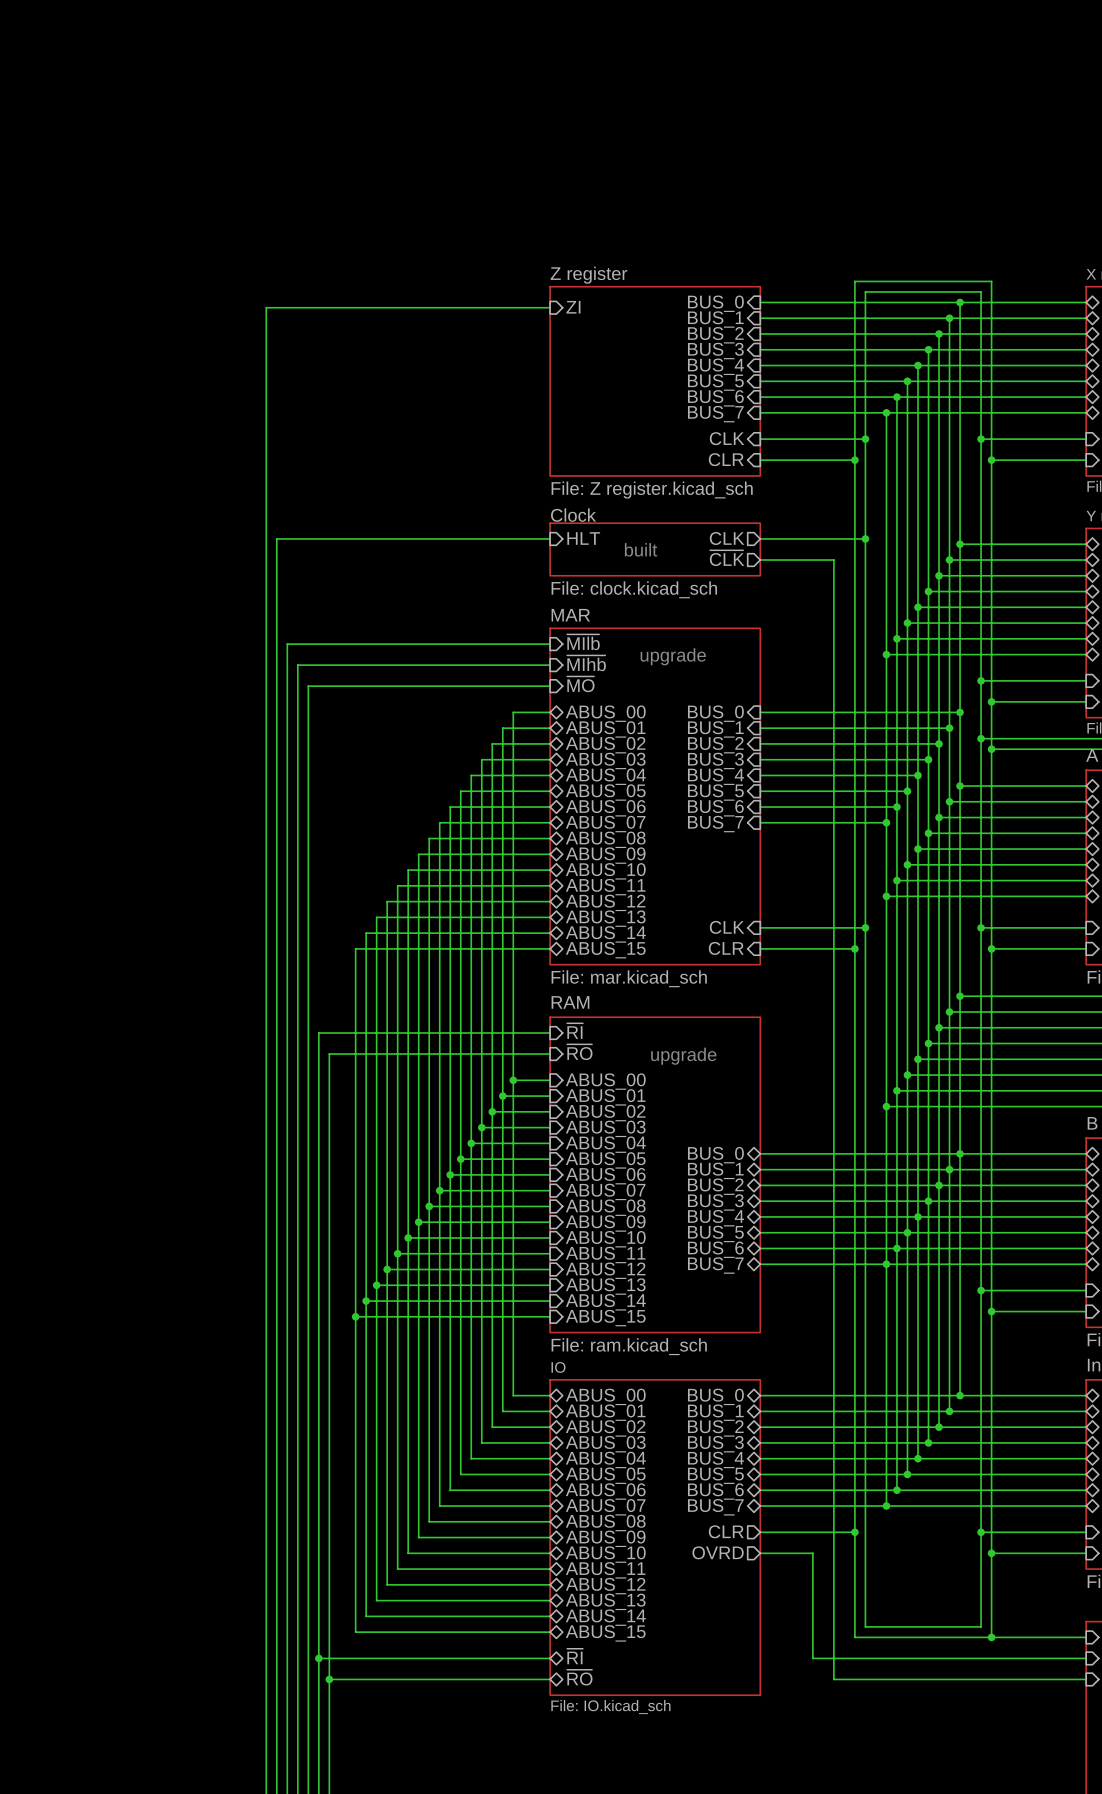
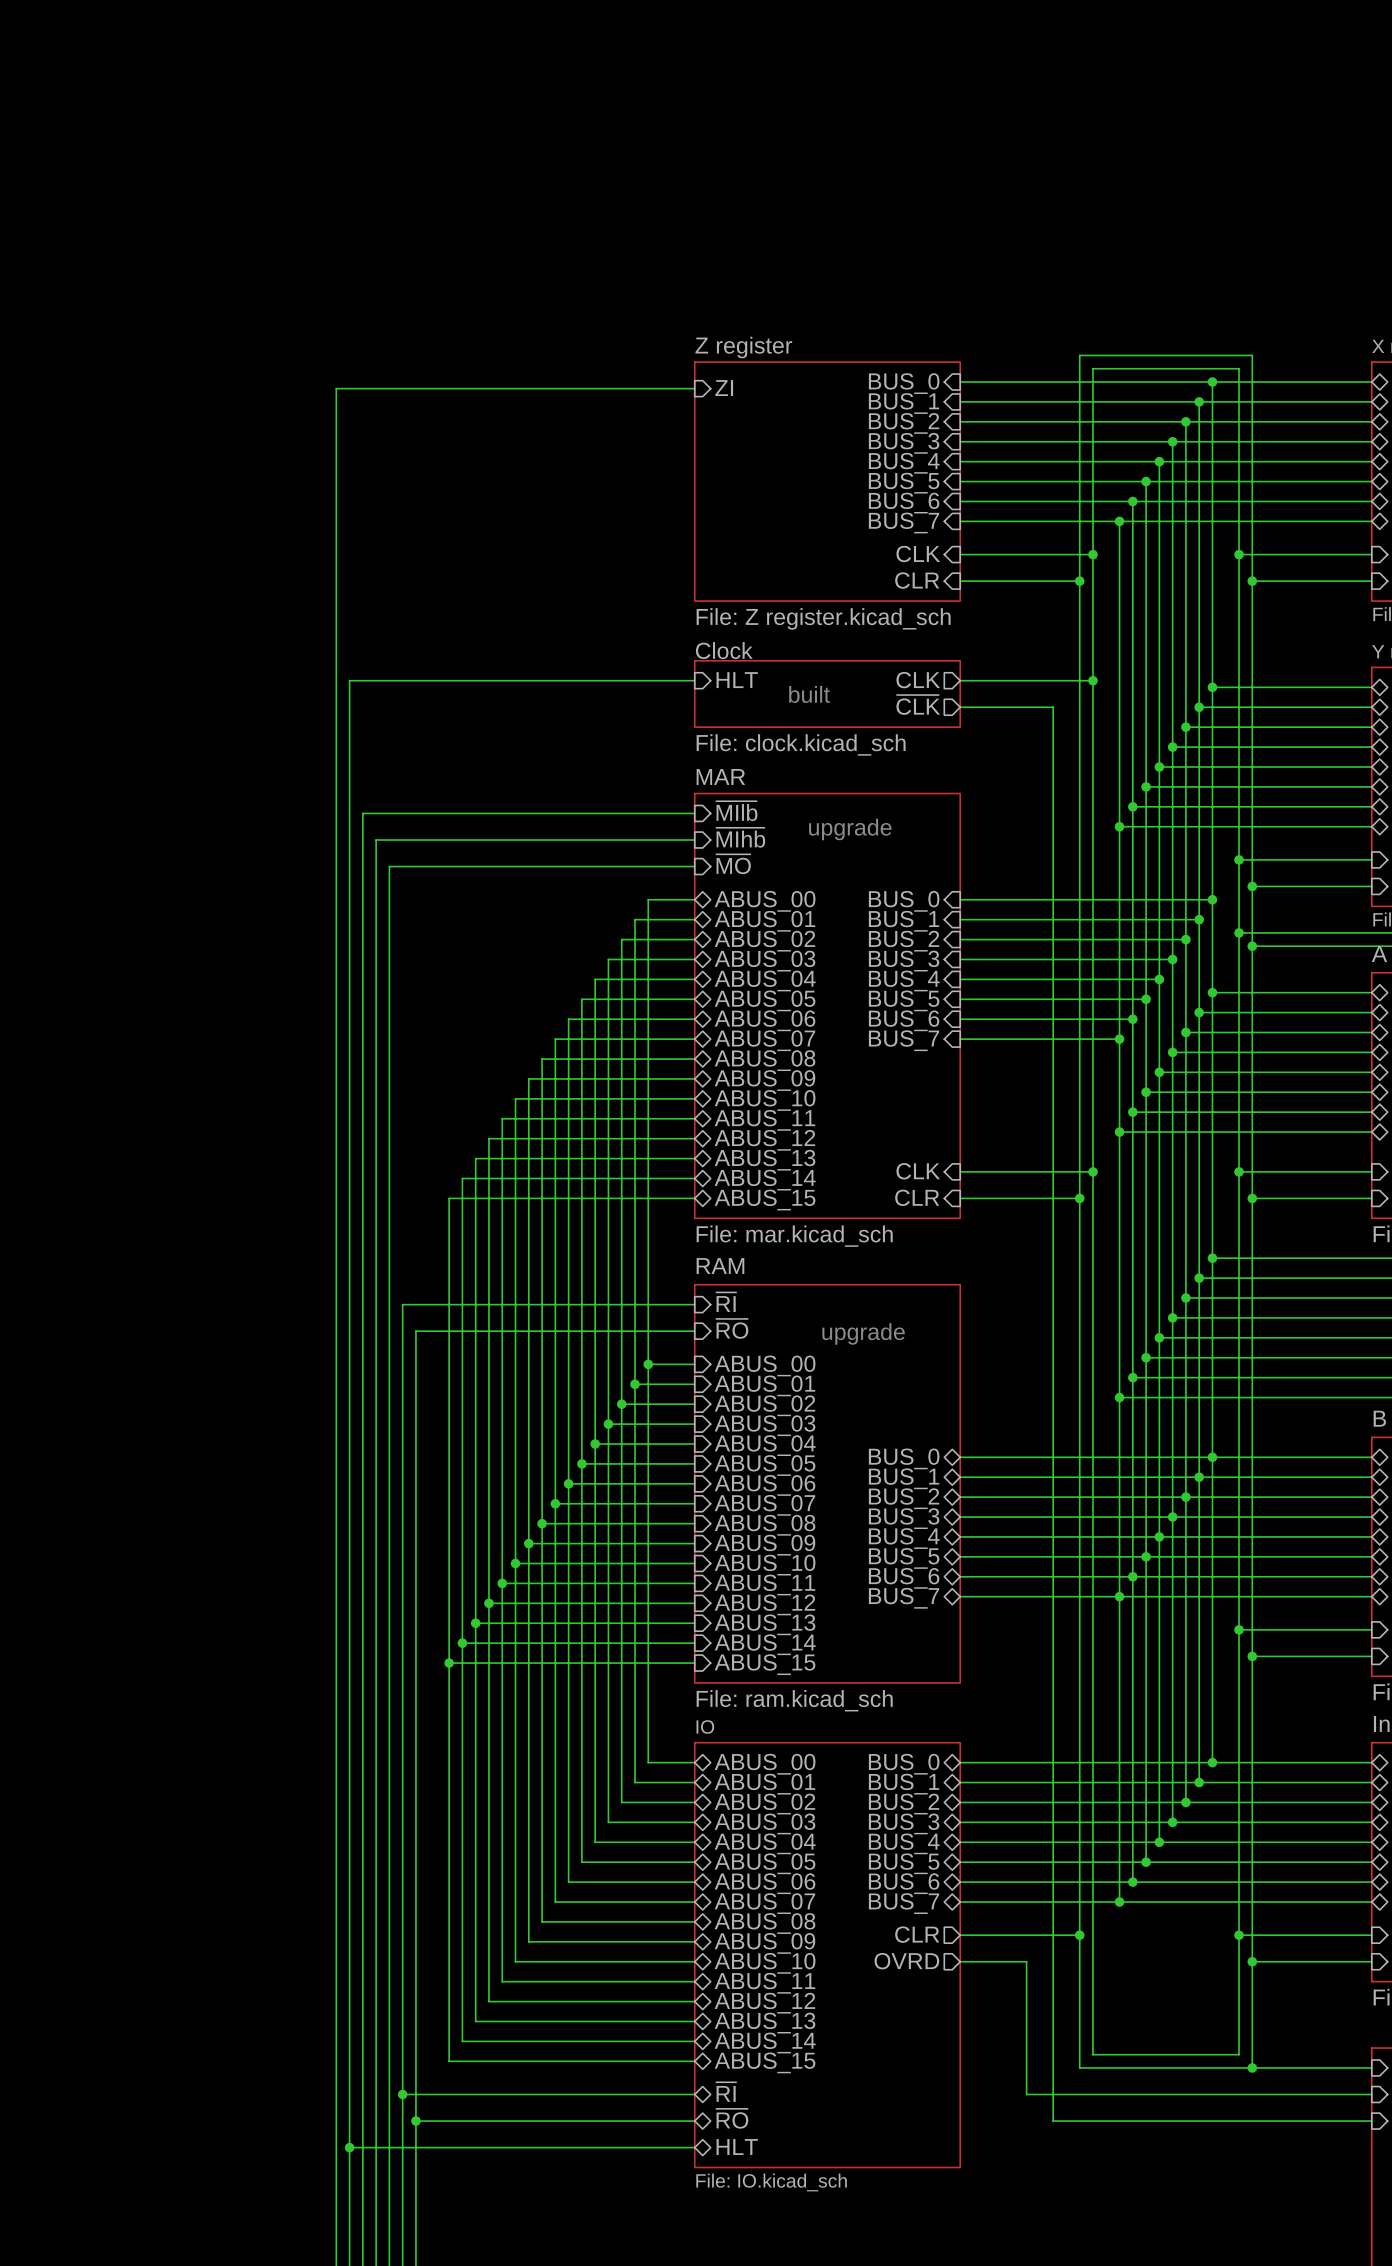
sheet IO: File: IO.kicad_sch (655, 1537) -> none
sheet IO: none -> File: IO.kicad_sch (827, 1955)
wire: none -> (349, 2147) (694, 2147)
junction: none -> (349, 2147)
sheet pin: none -> HLT (737, 2147)

